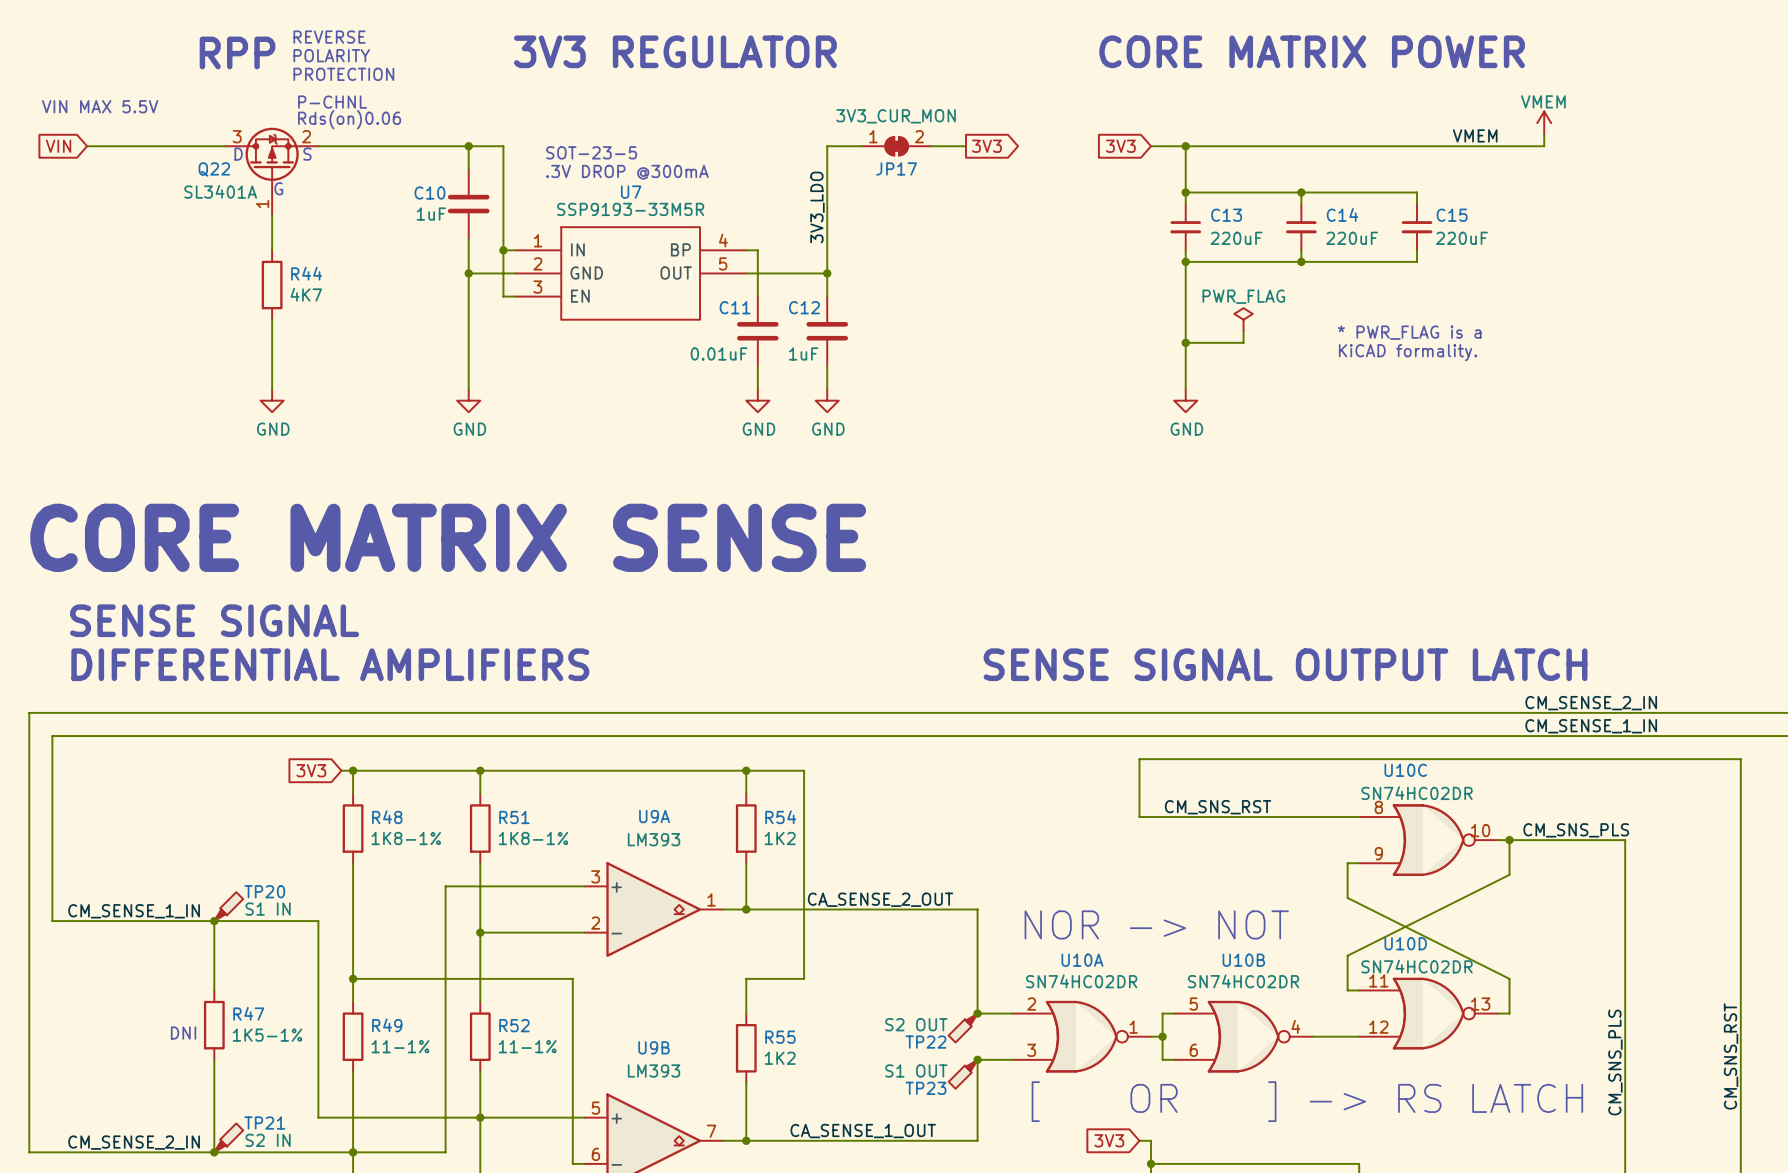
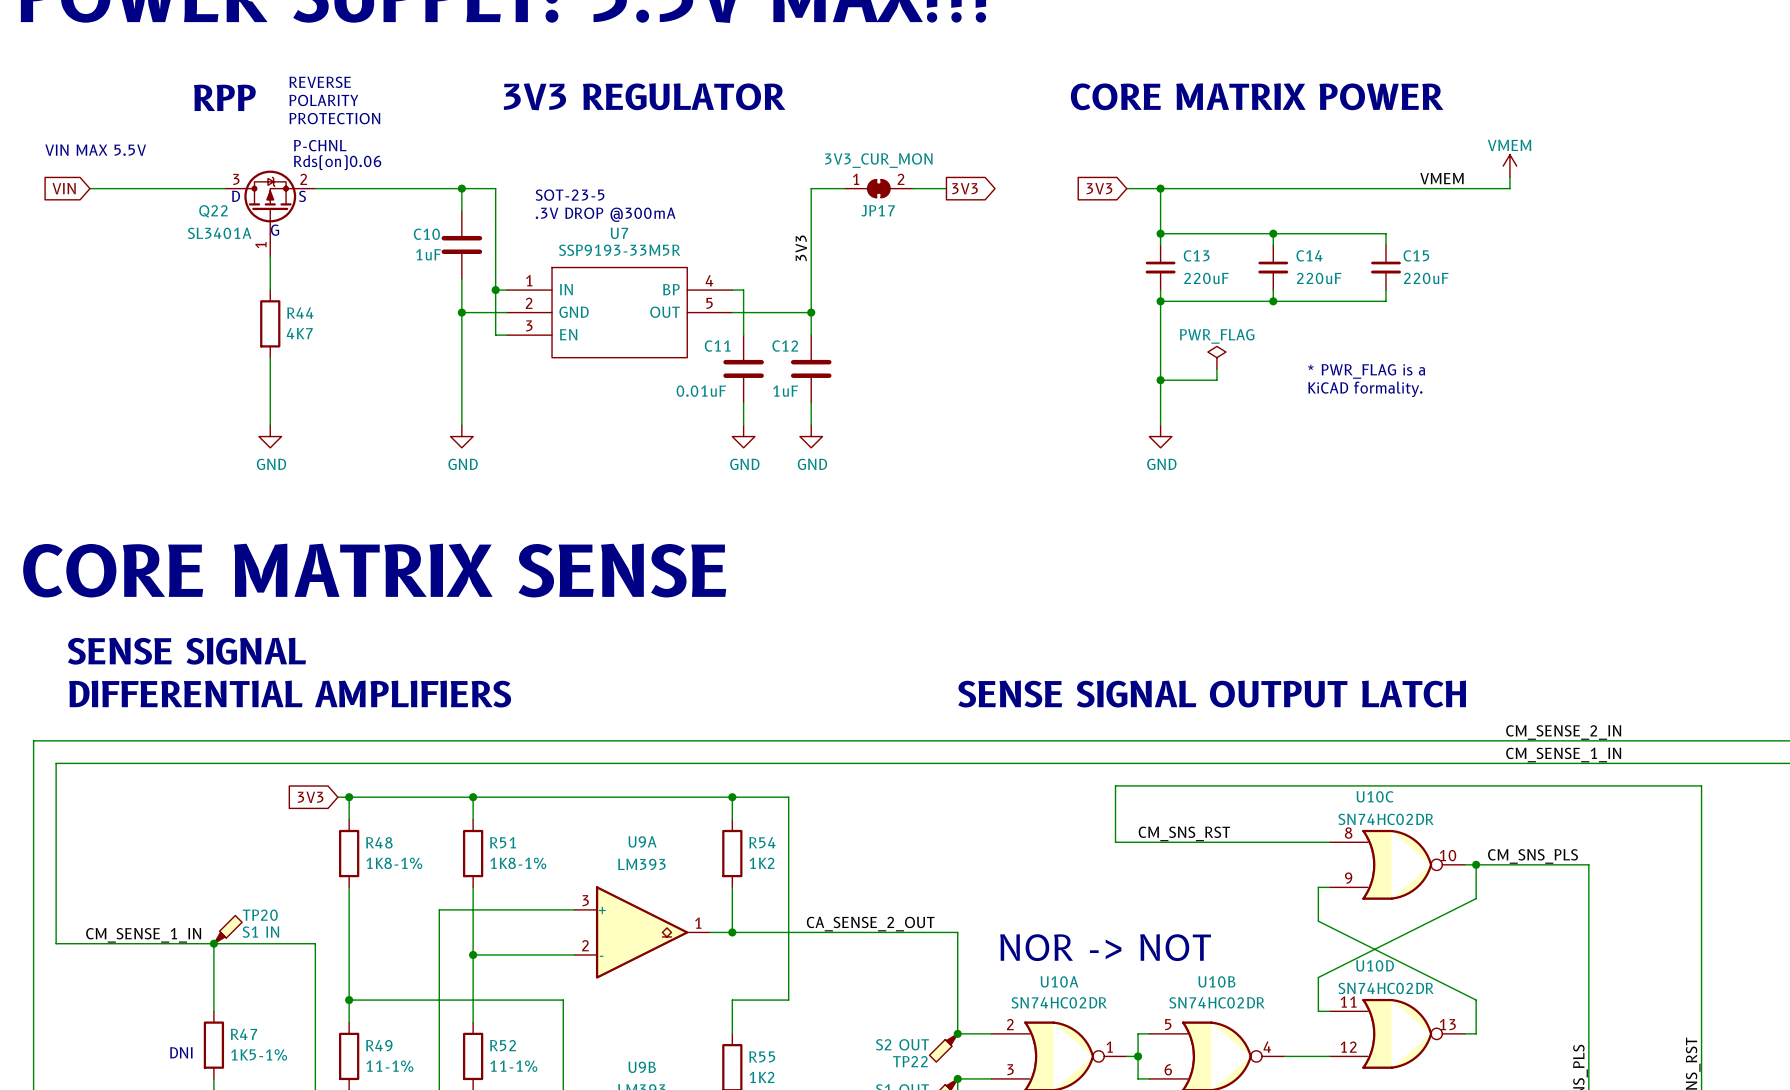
label: 3V3_LDO (817, 207) -> none
label: none -> 3V3 (801, 248)

